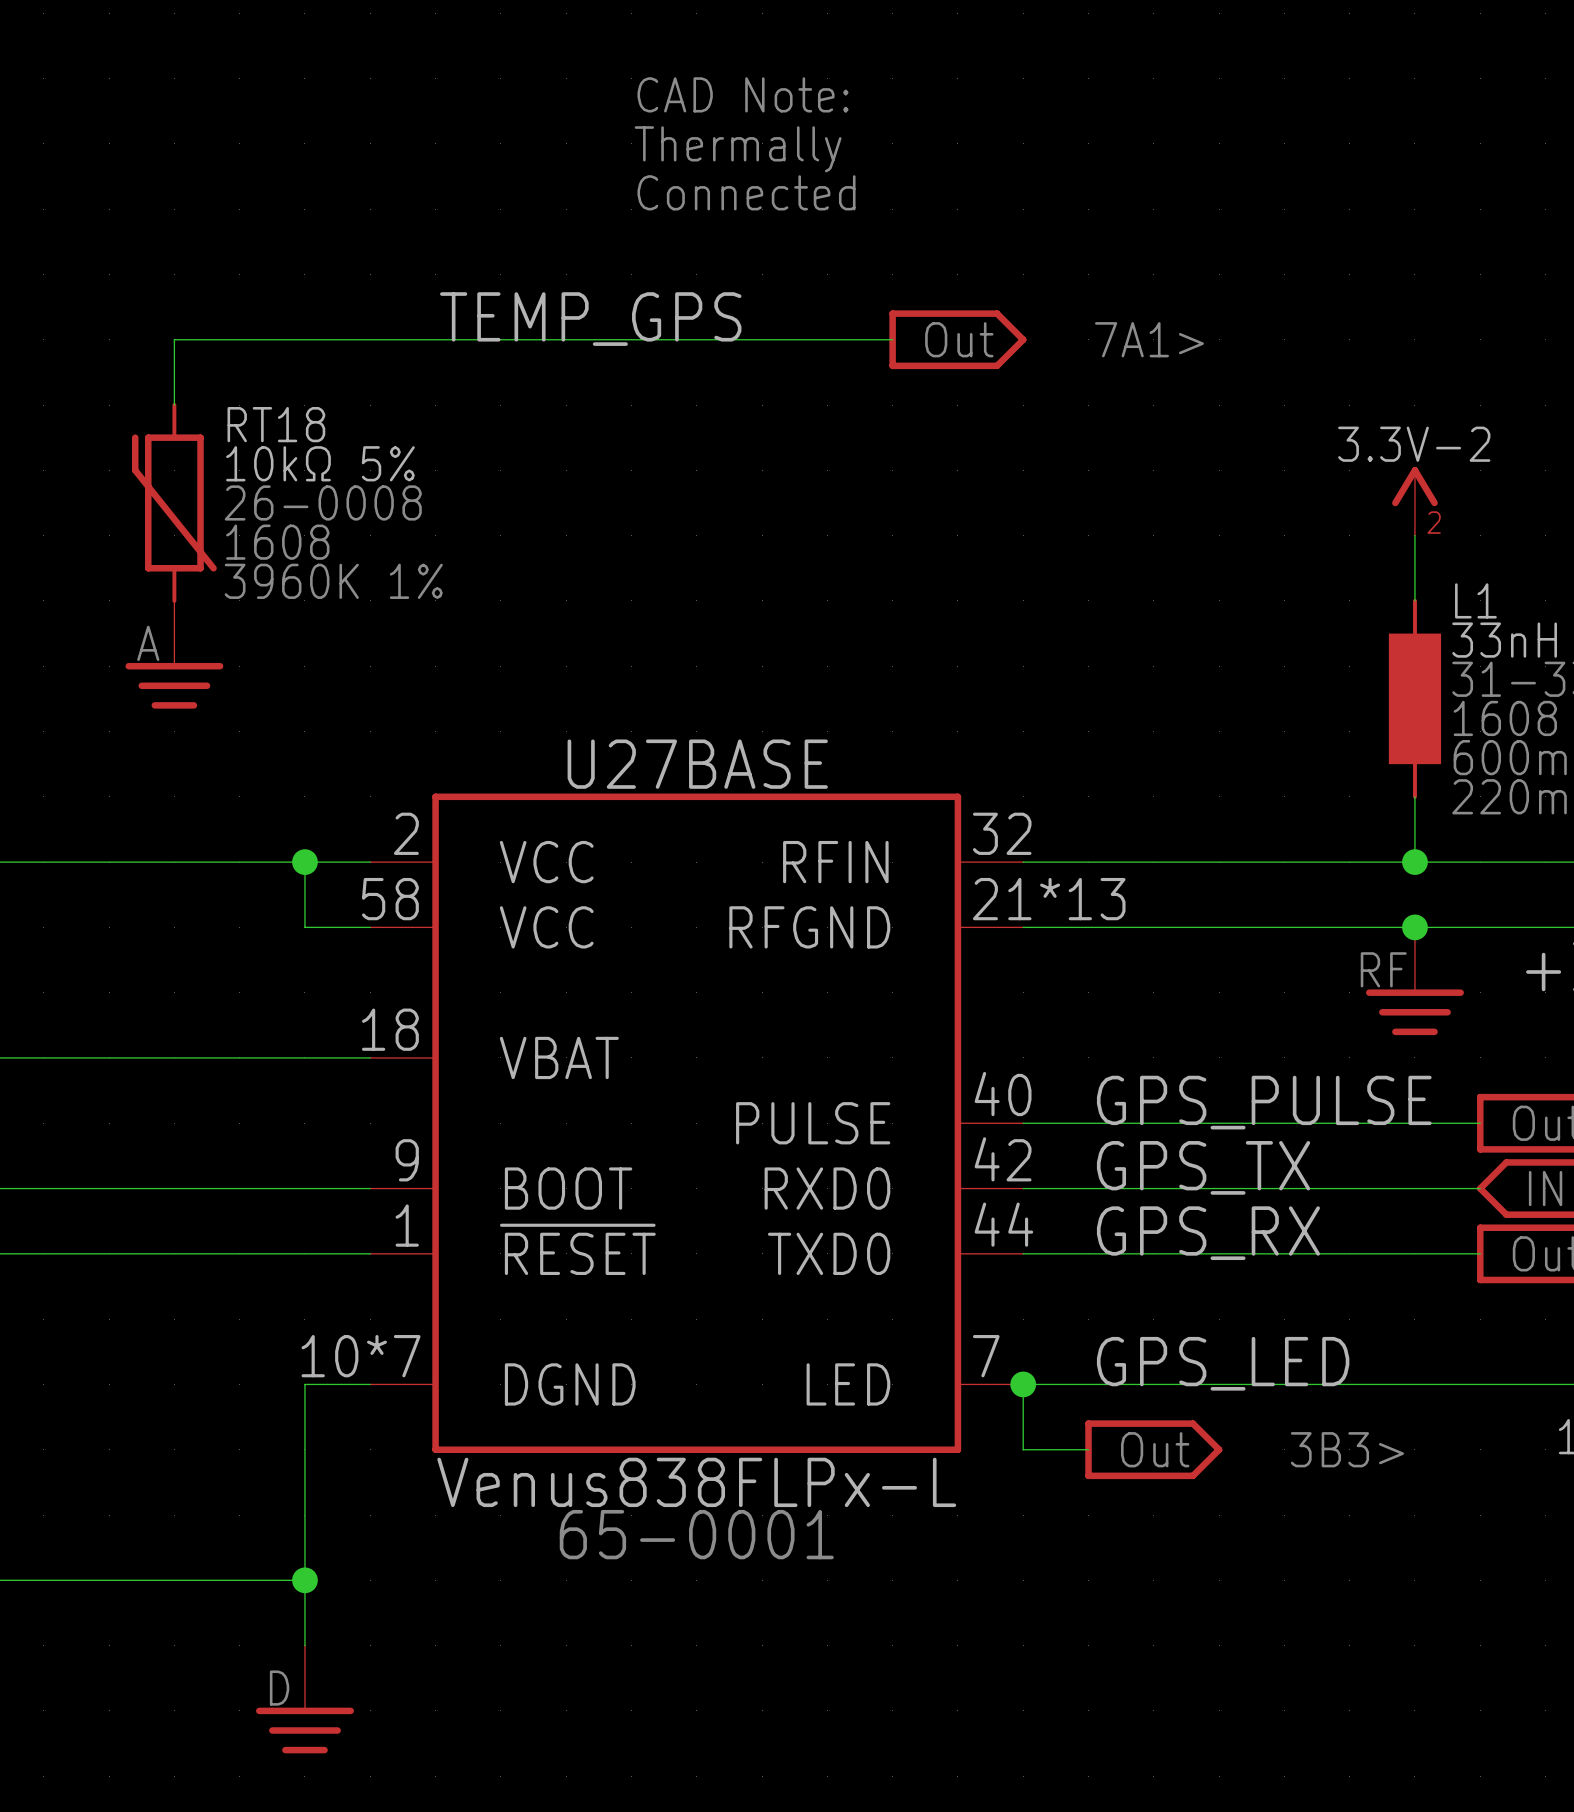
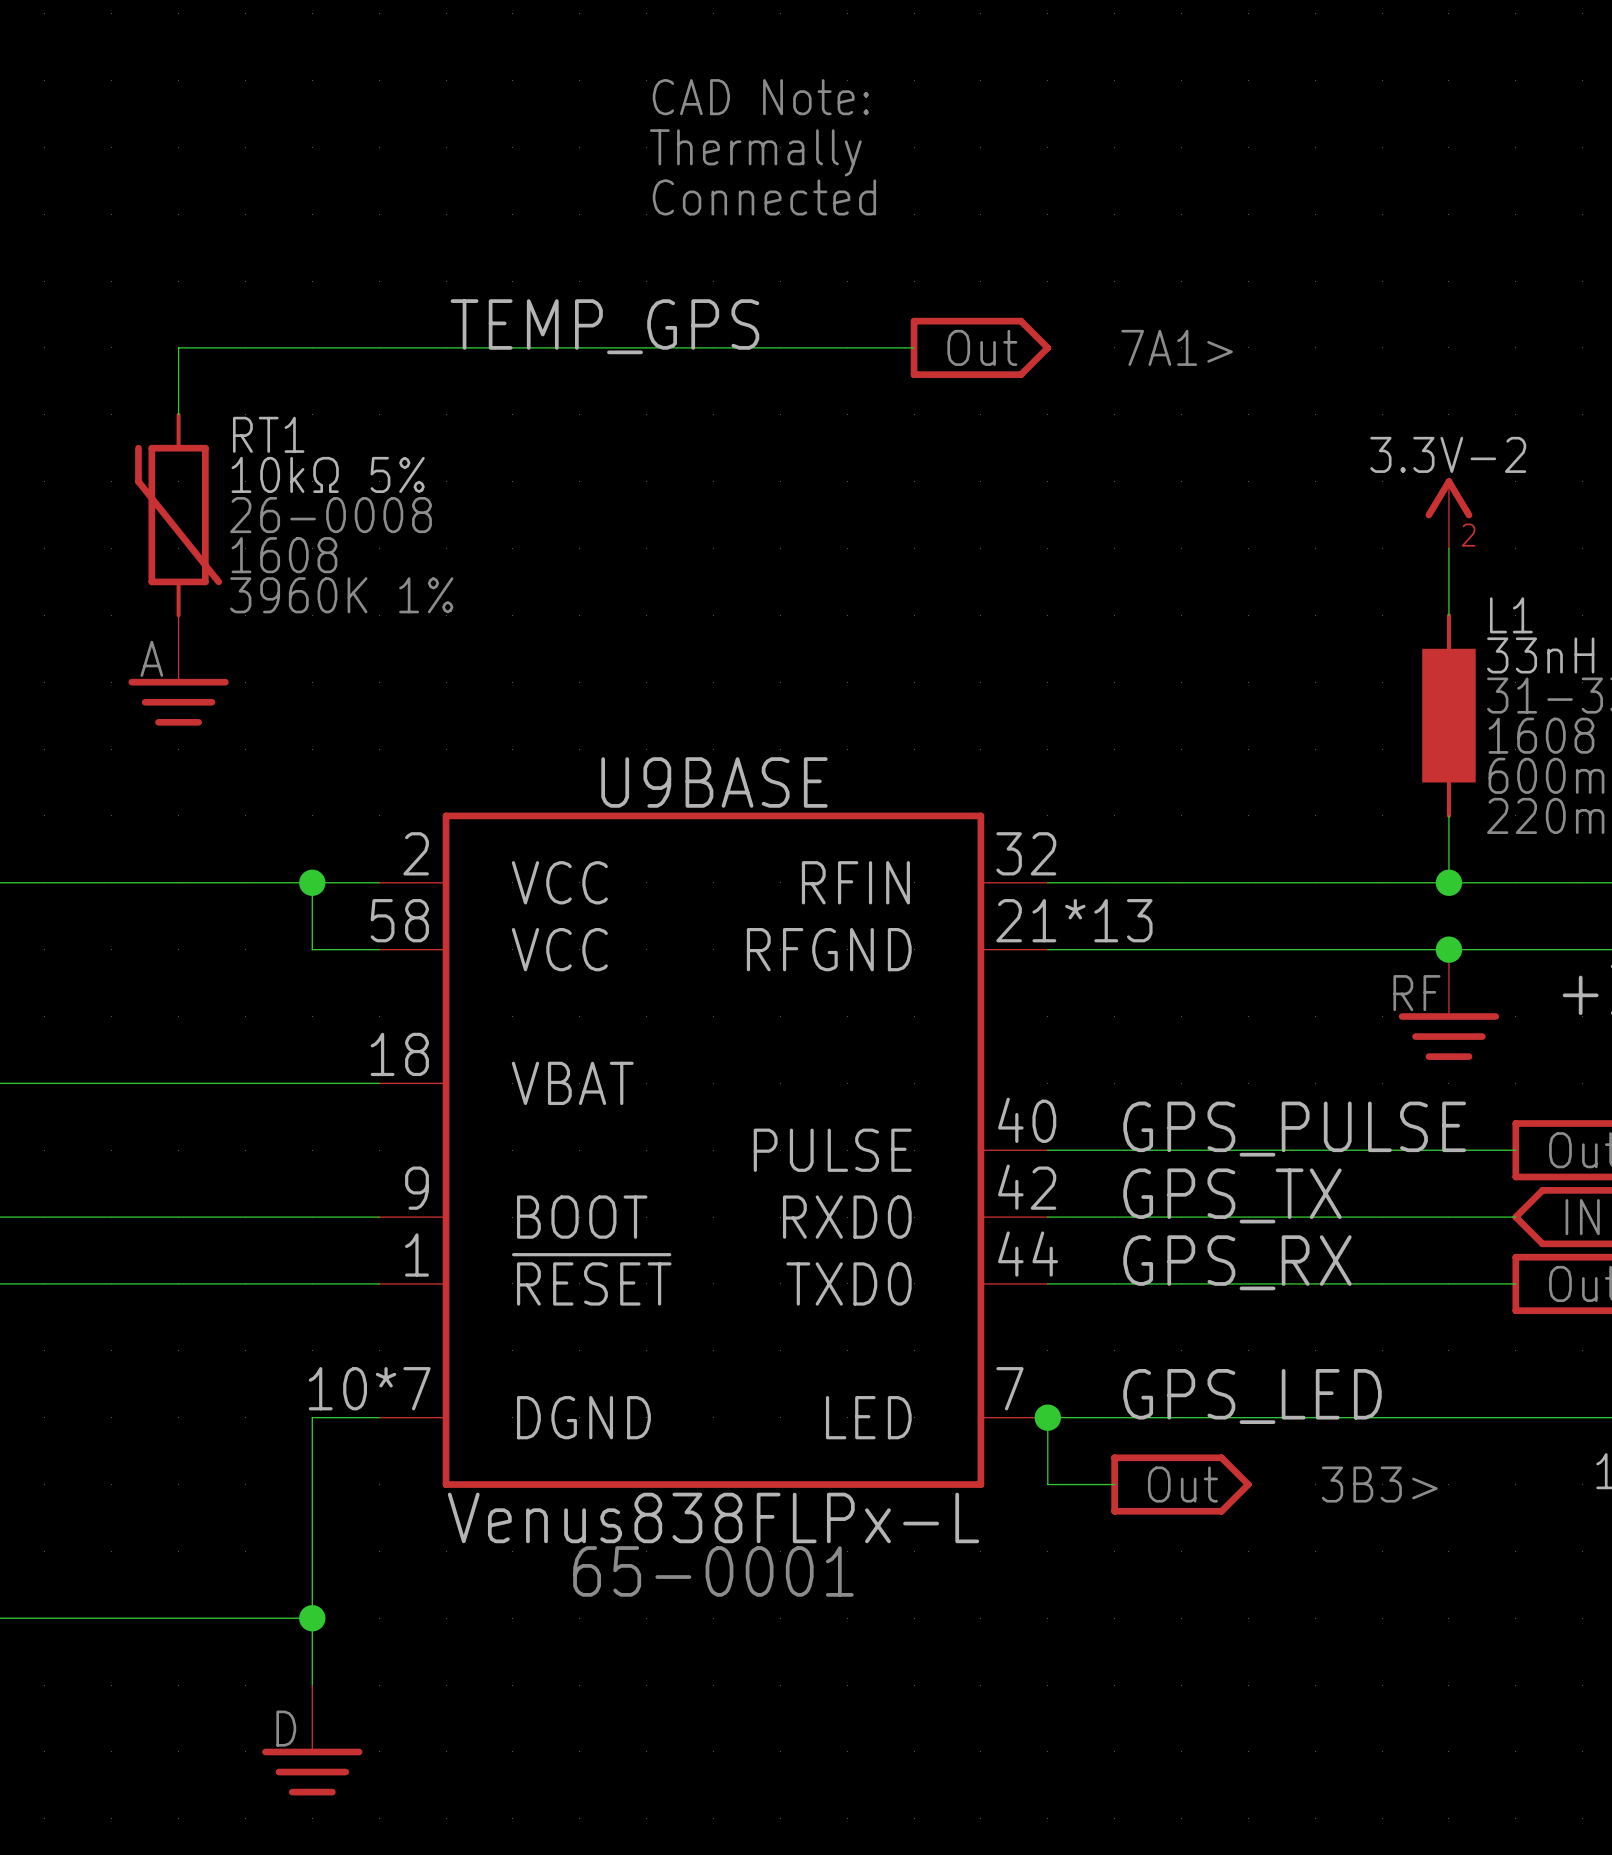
RT18 name: RT18 (276, 424) -> RT1 (268, 434)
U27BASE name: U27BASE (697, 764) -> U9BASE (714, 782)

